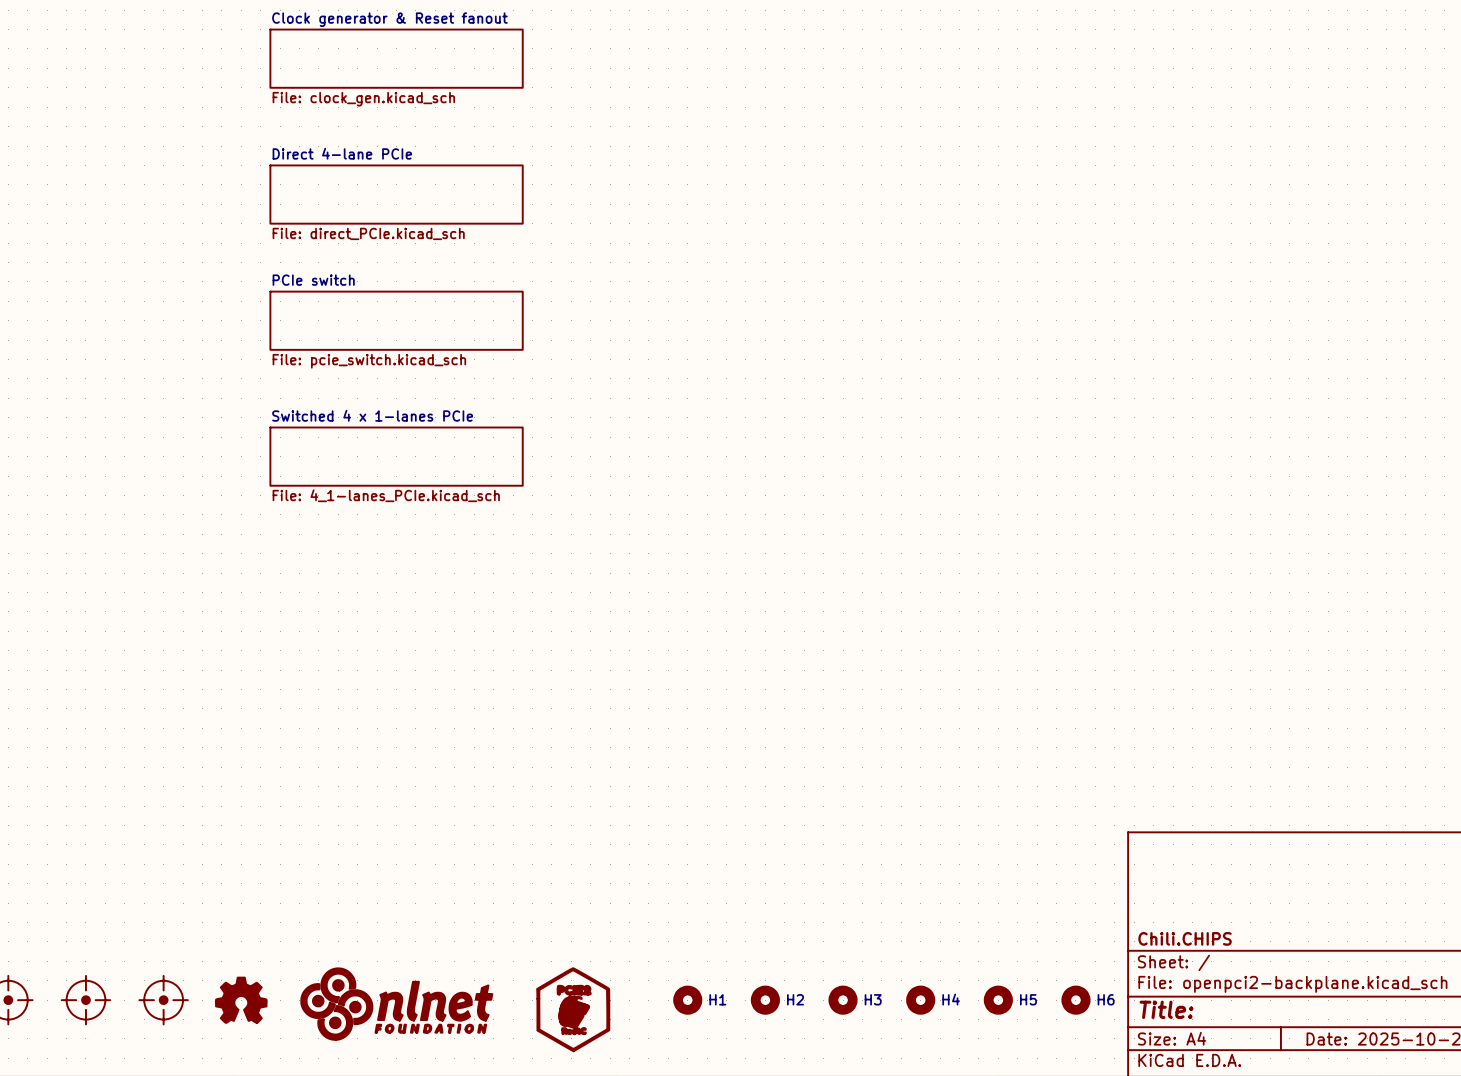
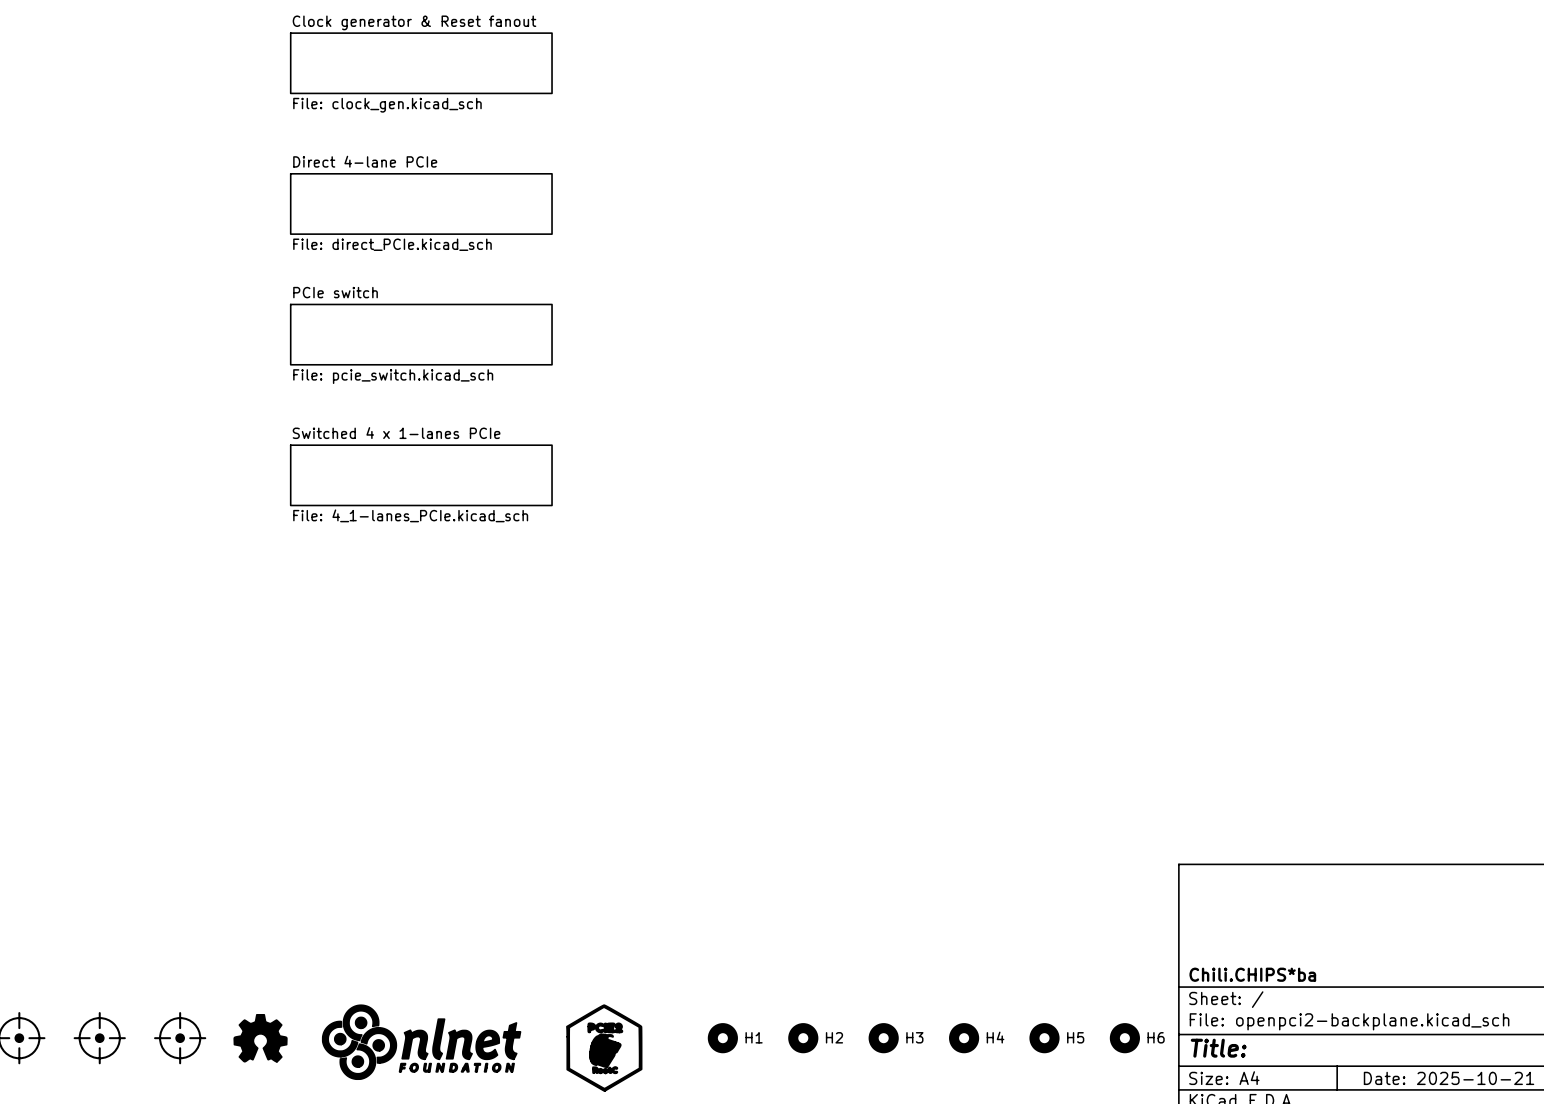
title block: Chili.CHIPS (1185, 938) -> Chili.CHIPS*ba (1252, 974)

